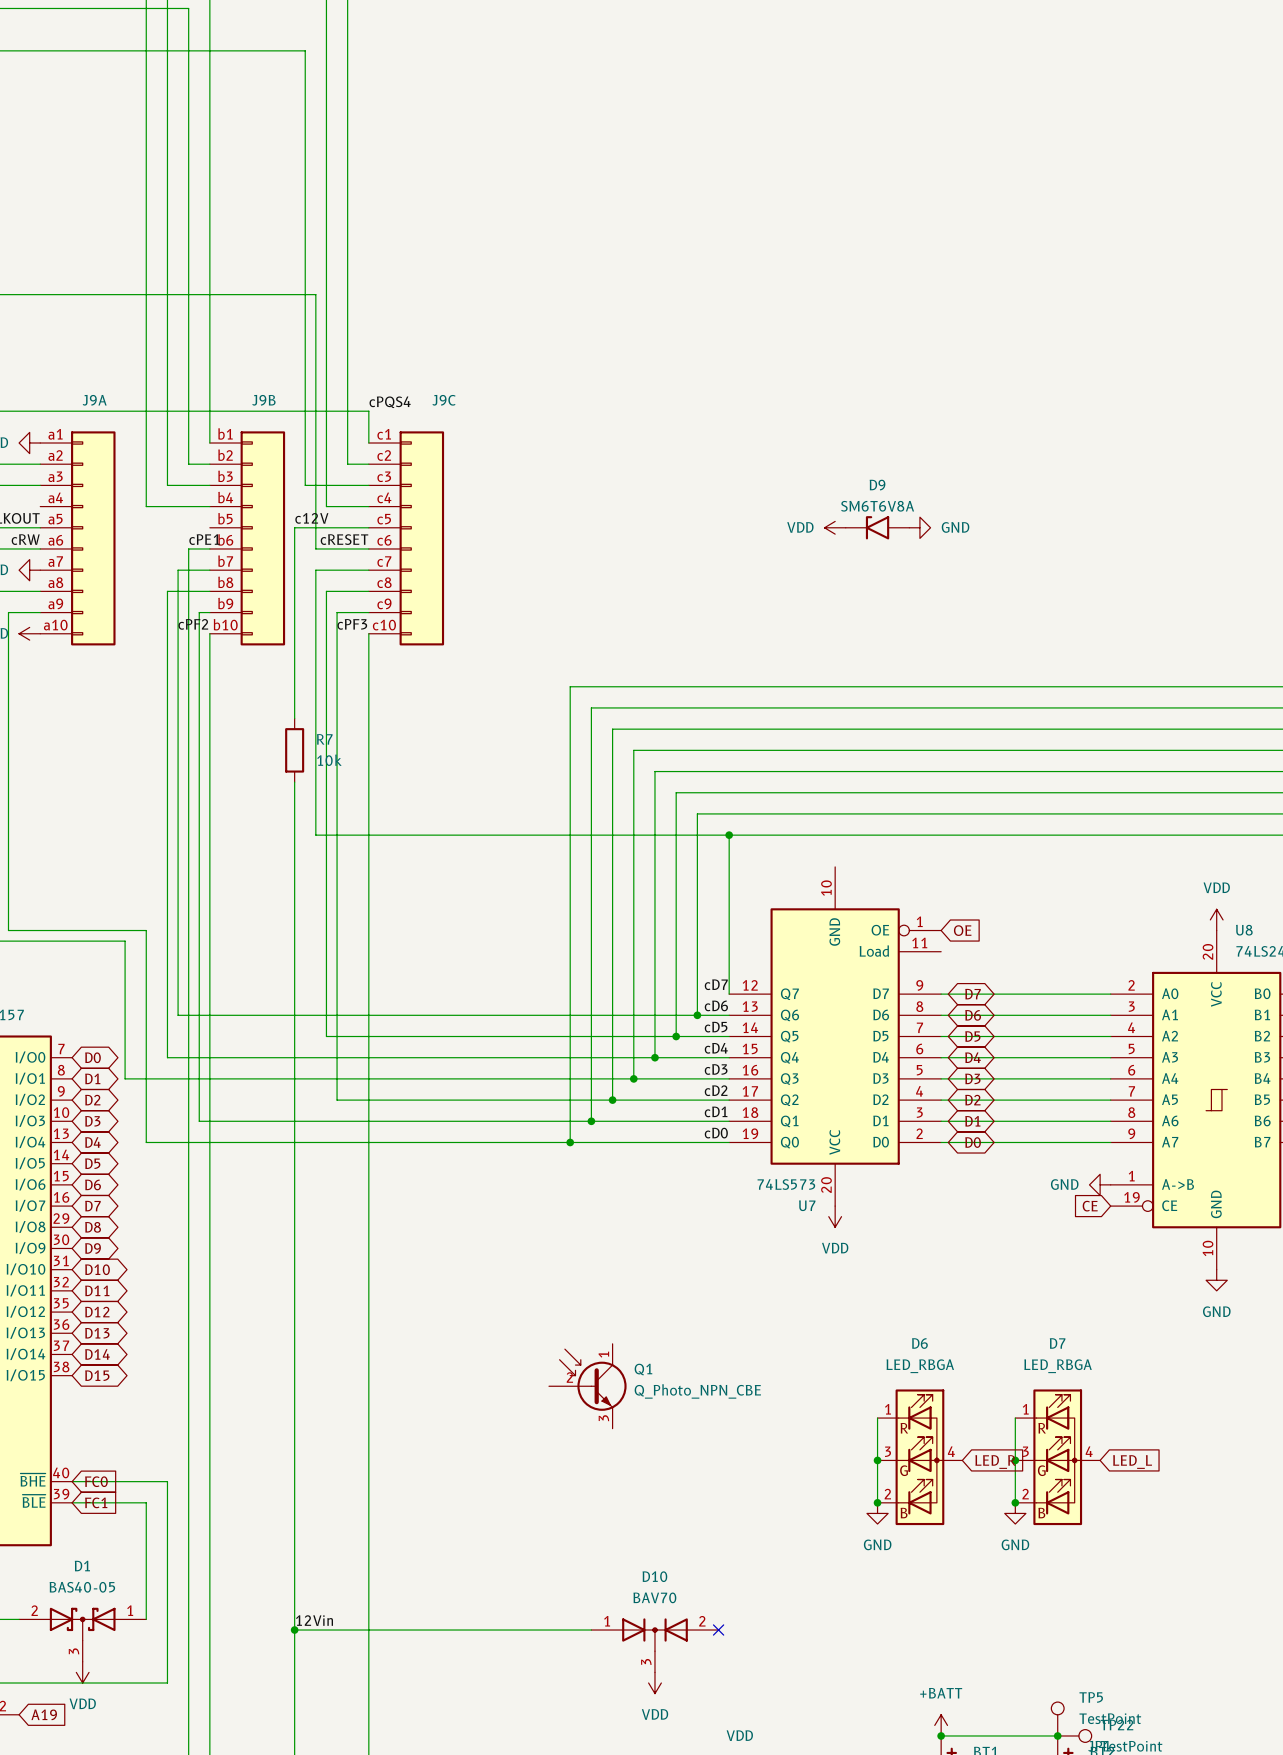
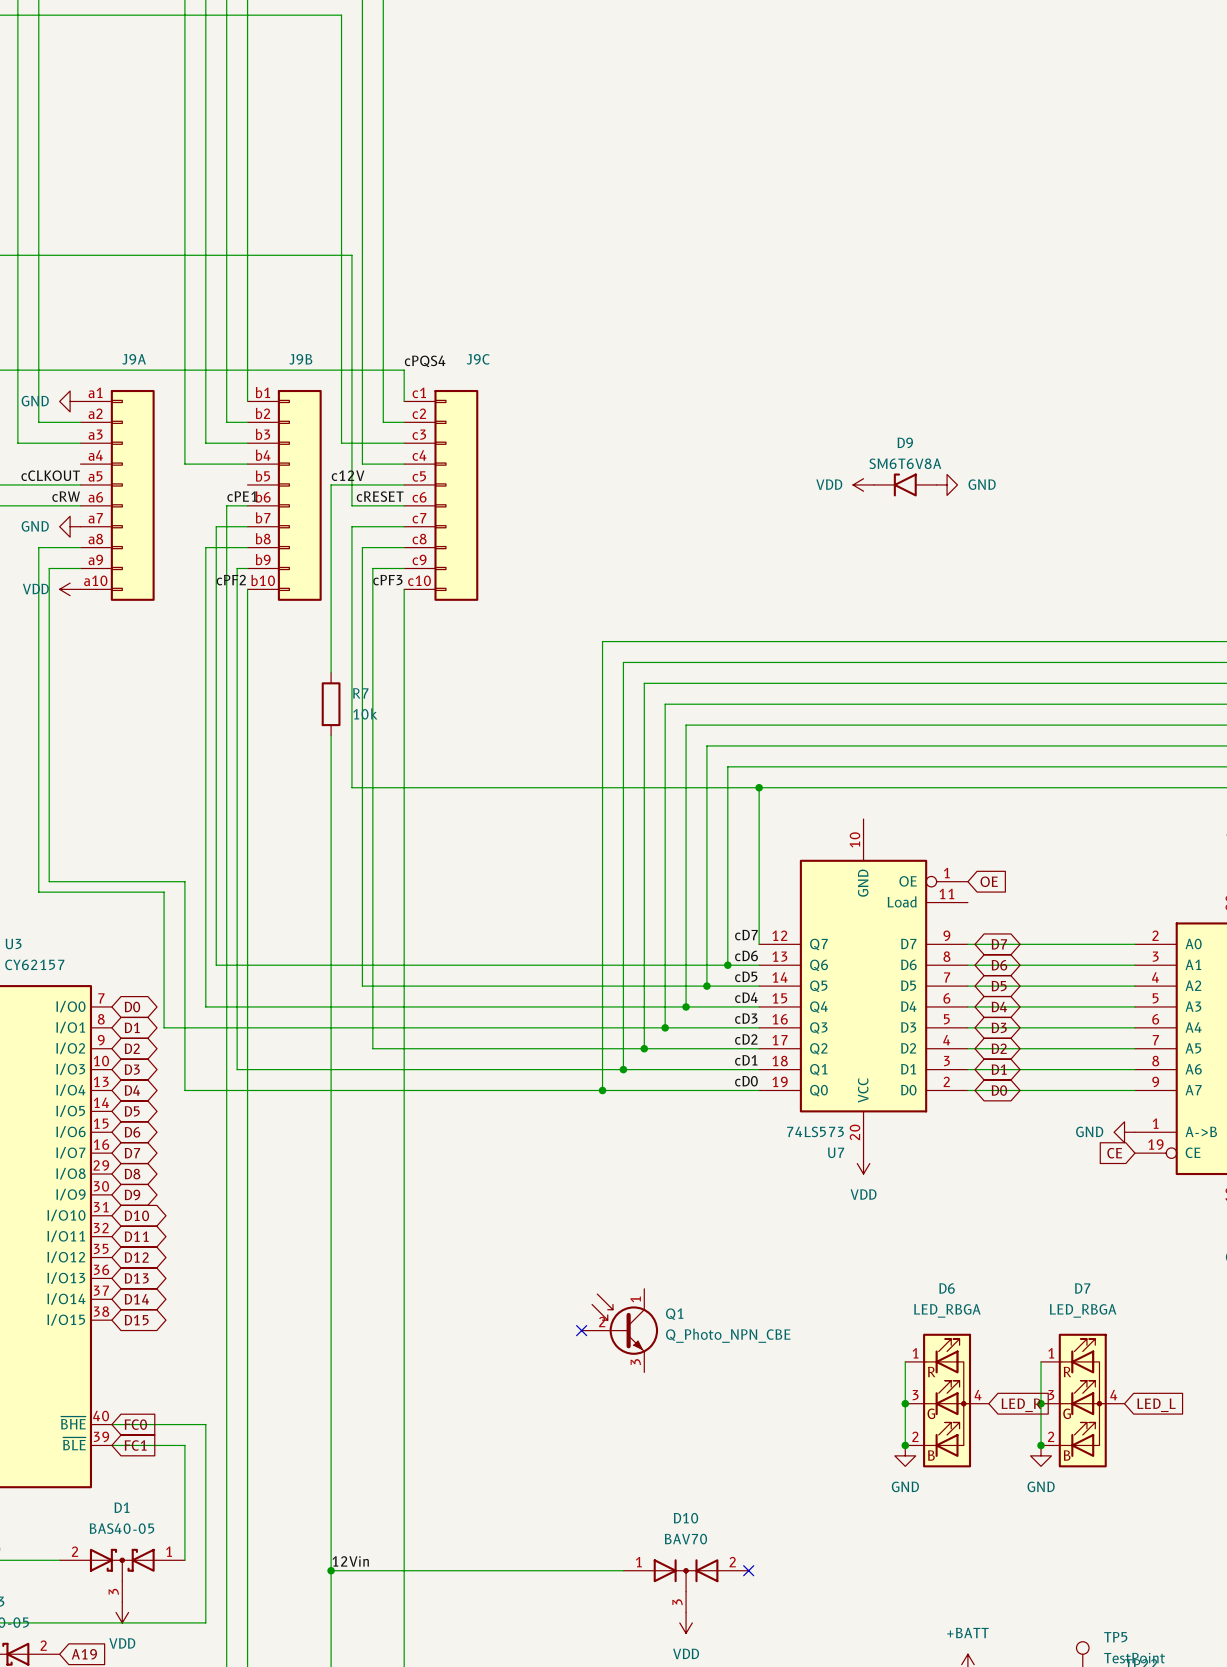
no-connect mark: none -> (581, 1330)

